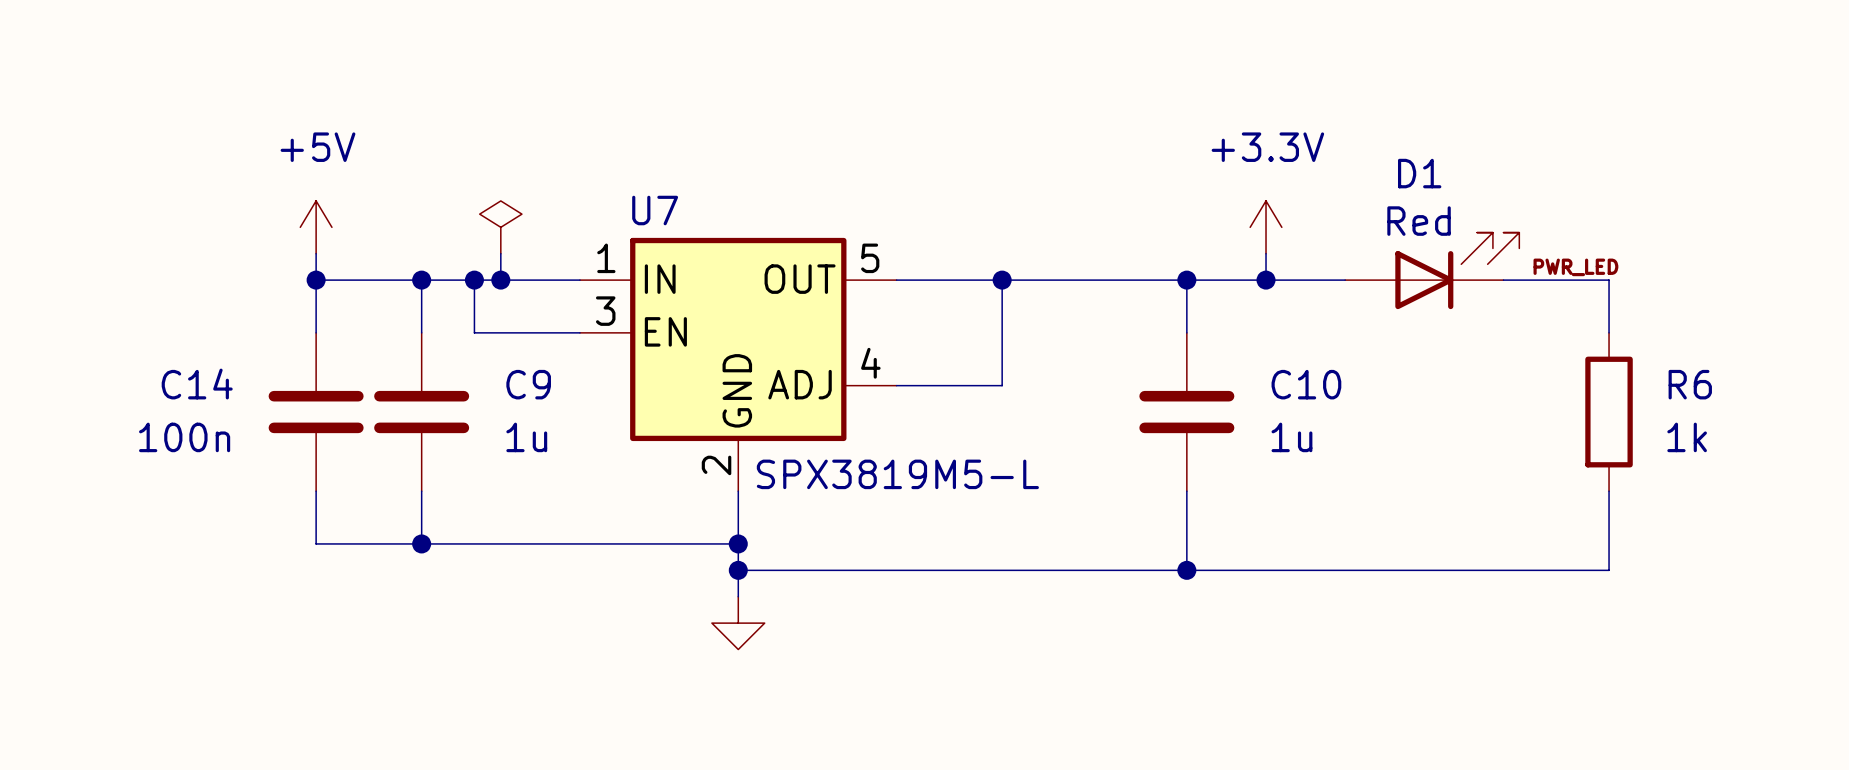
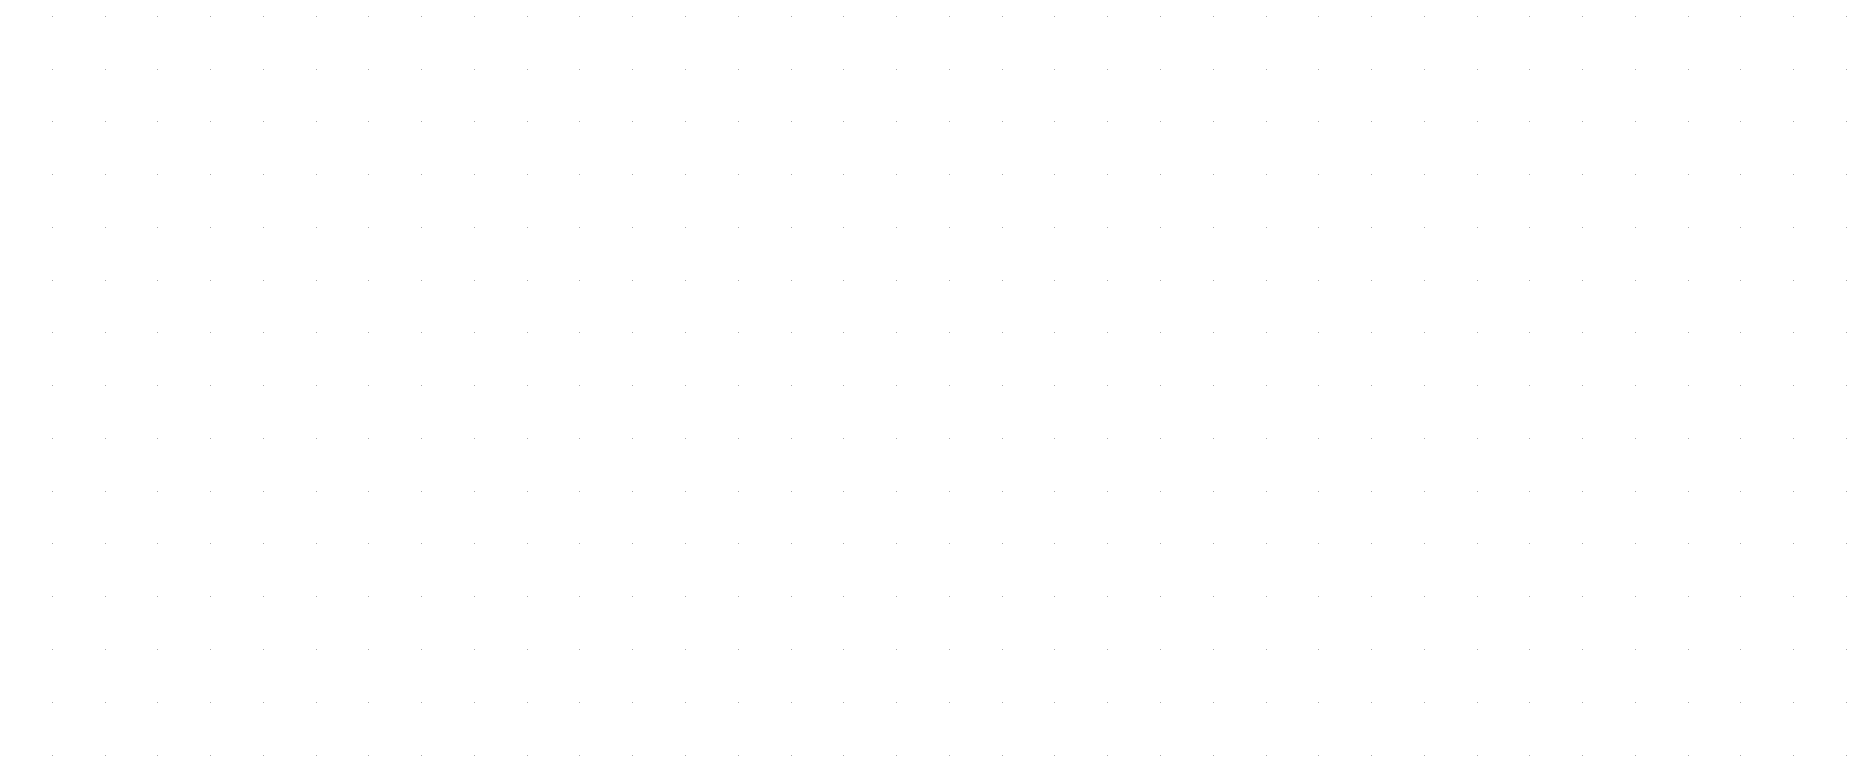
power symbol: +5V (316, 227) -> none
power symbol: (500, 227) -> none
power symbol: +3.3V (1266, 227) -> none
wire: (316, 253) (316, 332) -> none
wire: (500, 253) (500, 280) -> none
wire: (1266, 253) (1266, 280) -> none
label: PWR_LED (1575, 267) -> none
D1: Red (1432, 270) -> none
wire: (316, 280) (579, 280) -> none
junction: (316, 280) -> none
wire: (421, 280) (421, 332) -> none
junction: (421, 280) -> none
wire: (474, 280) (474, 332) (579, 332) -> none
junction: (474, 280) -> none
junction: (500, 280) -> none
wire: (896, 280) (1345, 280) -> none
wire: (1002, 280) (1002, 385) (896, 385) -> none
junction: (1002, 280) -> none
wire: (1186, 280) (1186, 332) -> none
junction: (1186, 280) -> none
junction: (1266, 280) -> none
wire: (1503, 280) (1609, 280) (1609, 332) -> none
U7: SPX3819M5-L (738, 364) -> none
C14: 100n (316, 412) -> none
C9: 1u (421, 412) -> none
C10: 1u (1186, 412) -> none
R6: 1k (1609, 412) -> none
wire: (316, 491) (316, 543) (738, 543) -> none
wire: (421, 491) (421, 543) -> none
wire: (738, 491) (738, 596) -> none
wire: (1186, 491) (1186, 570) -> none
wire: (1609, 491) (1609, 570) (738, 570) -> none
junction: (421, 543) -> none
junction: (738, 543) -> none
junction: (738, 570) -> none
junction: (1186, 570) -> none
power symbol: (738, 623) -> none

